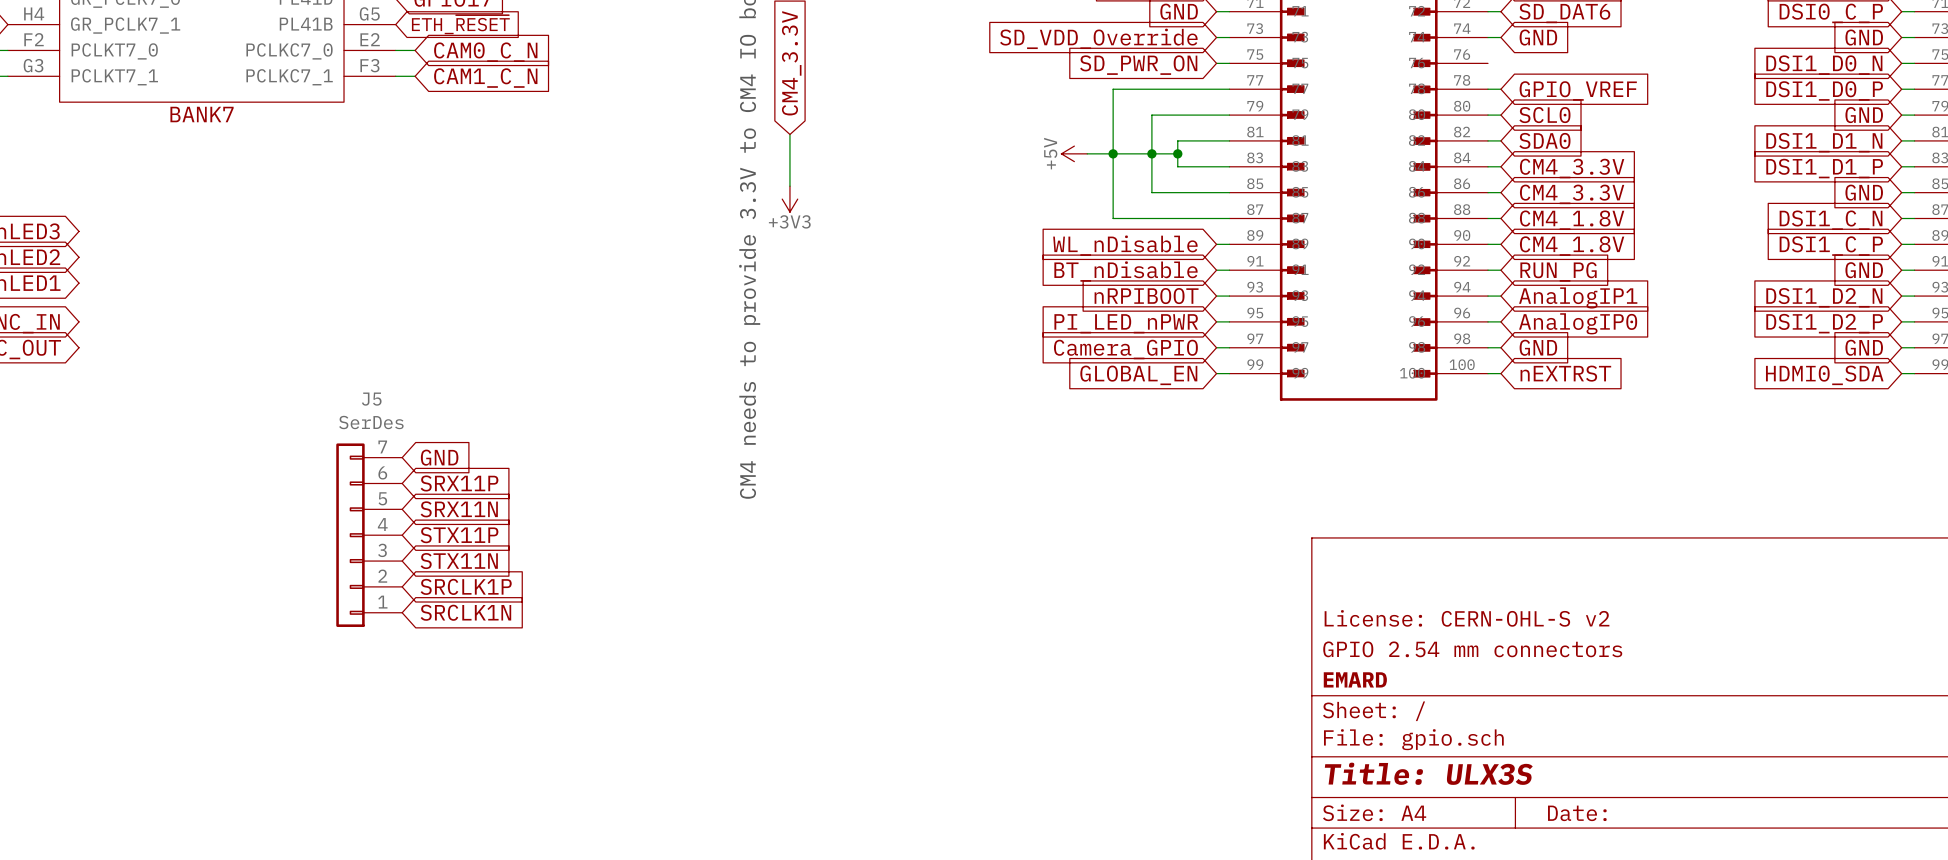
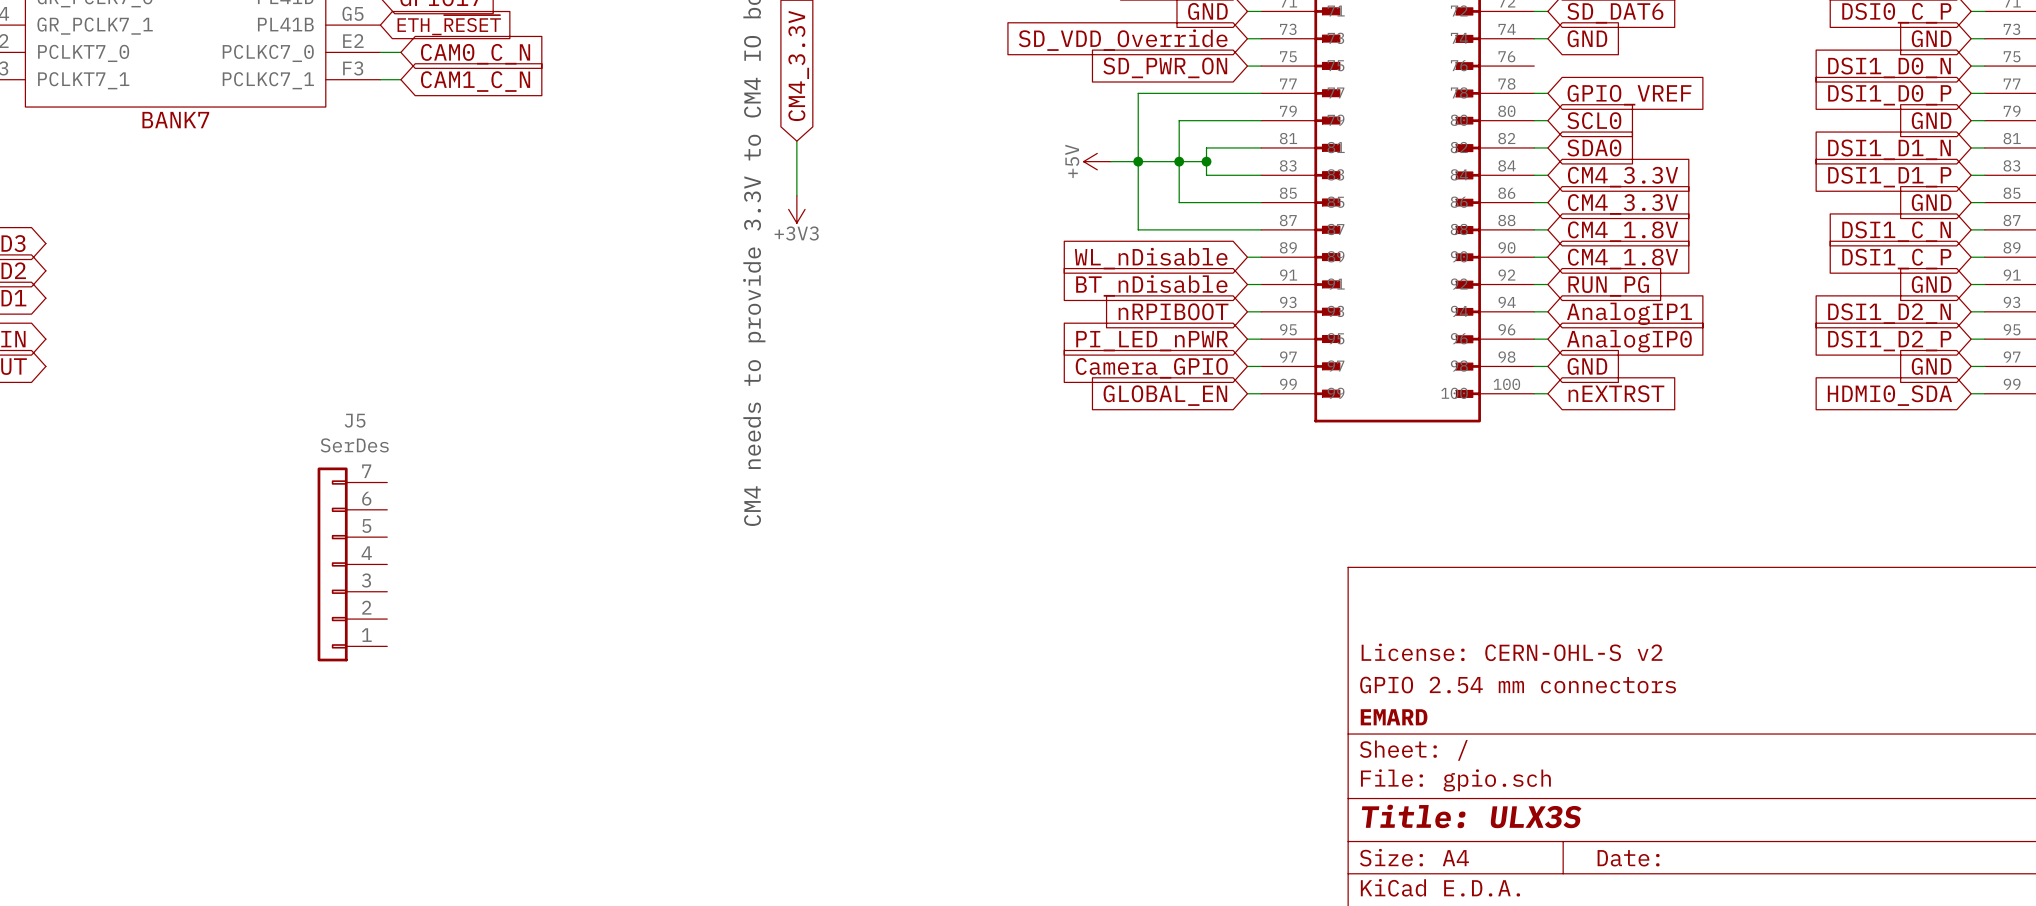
global label: GND (439, 457) -> none
global label: SRX11P (459, 483) -> none
global label: SRX11N (459, 509) -> none
global label: STX11P (459, 535) -> none
global label: STX11N (459, 561) -> none
global label: SRCLK1P (466, 586) -> none
global label: SRCLK1N (465, 612) -> none

